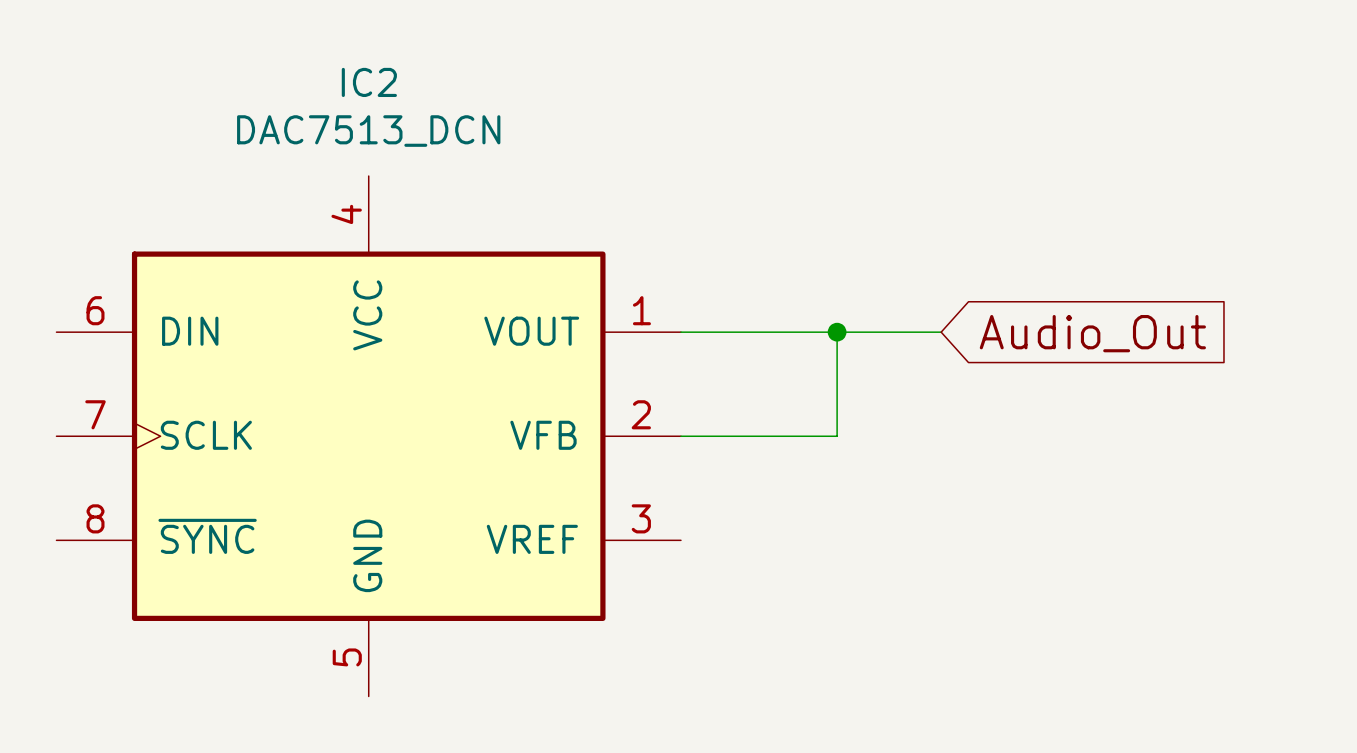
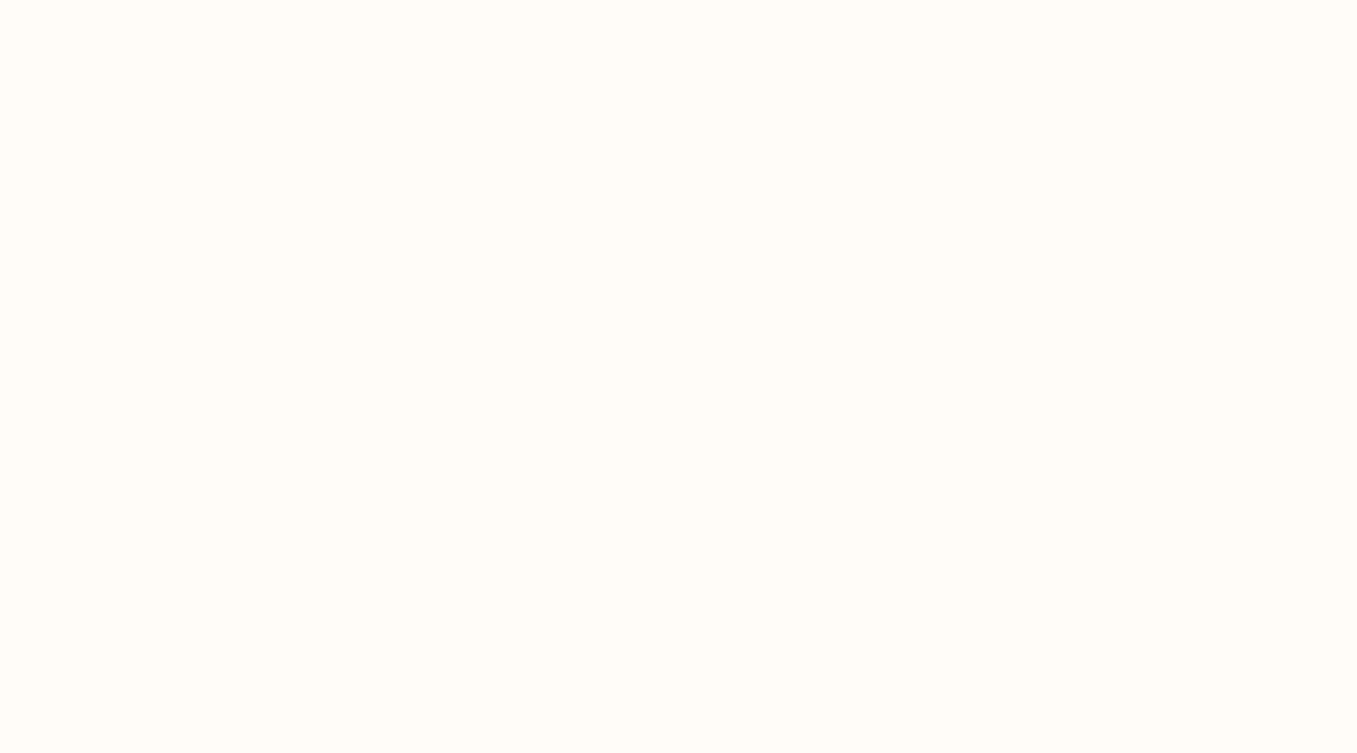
wire: (680, 332) (941, 332) -> none
wire: (837, 332) (837, 436) (680, 436) -> none
junction: (837, 332) -> none
global label: Audio_Out (1092, 333) -> none
IC2: DAC7513_DCN (368, 436) -> none

